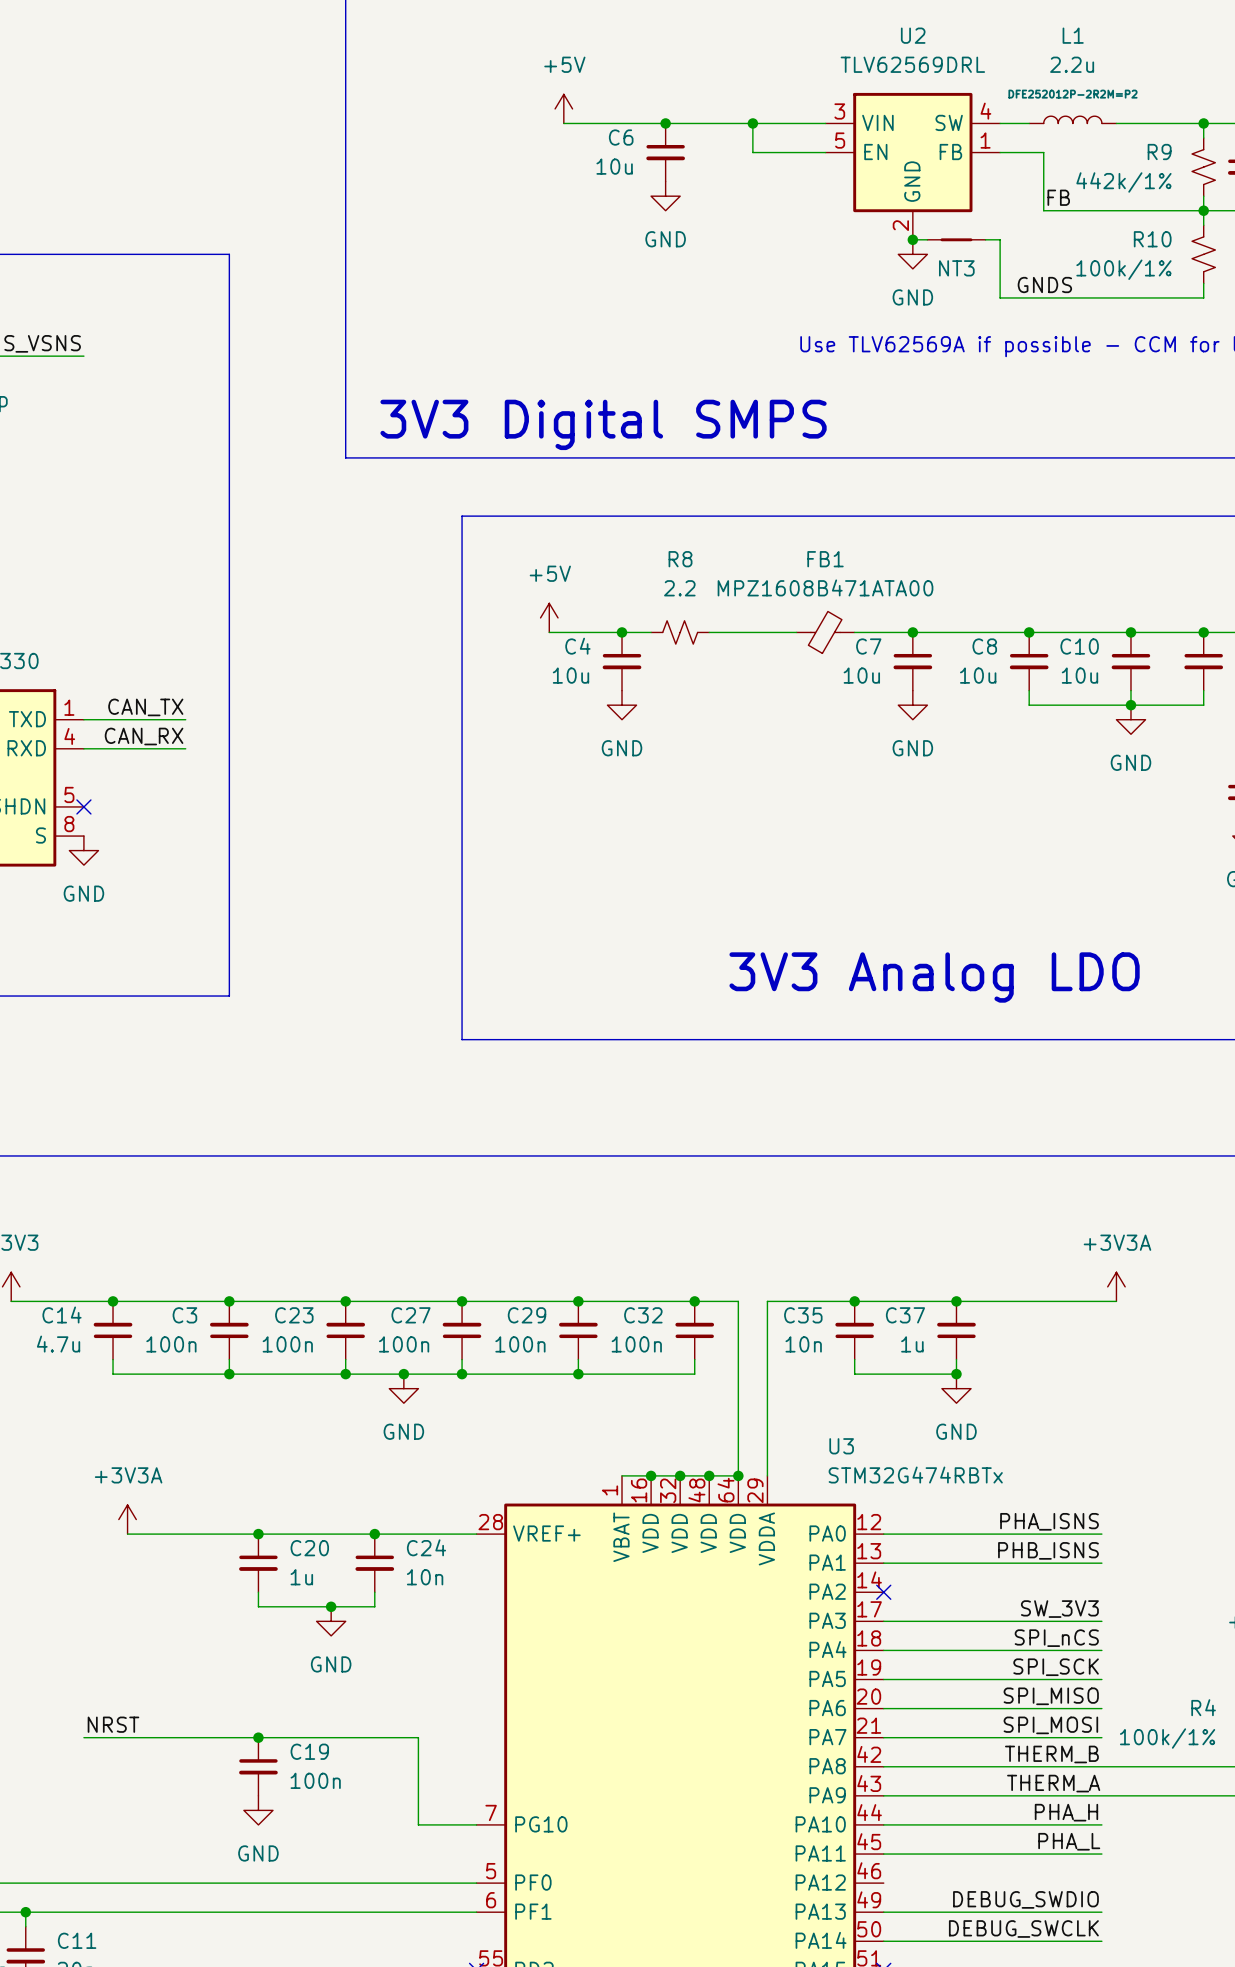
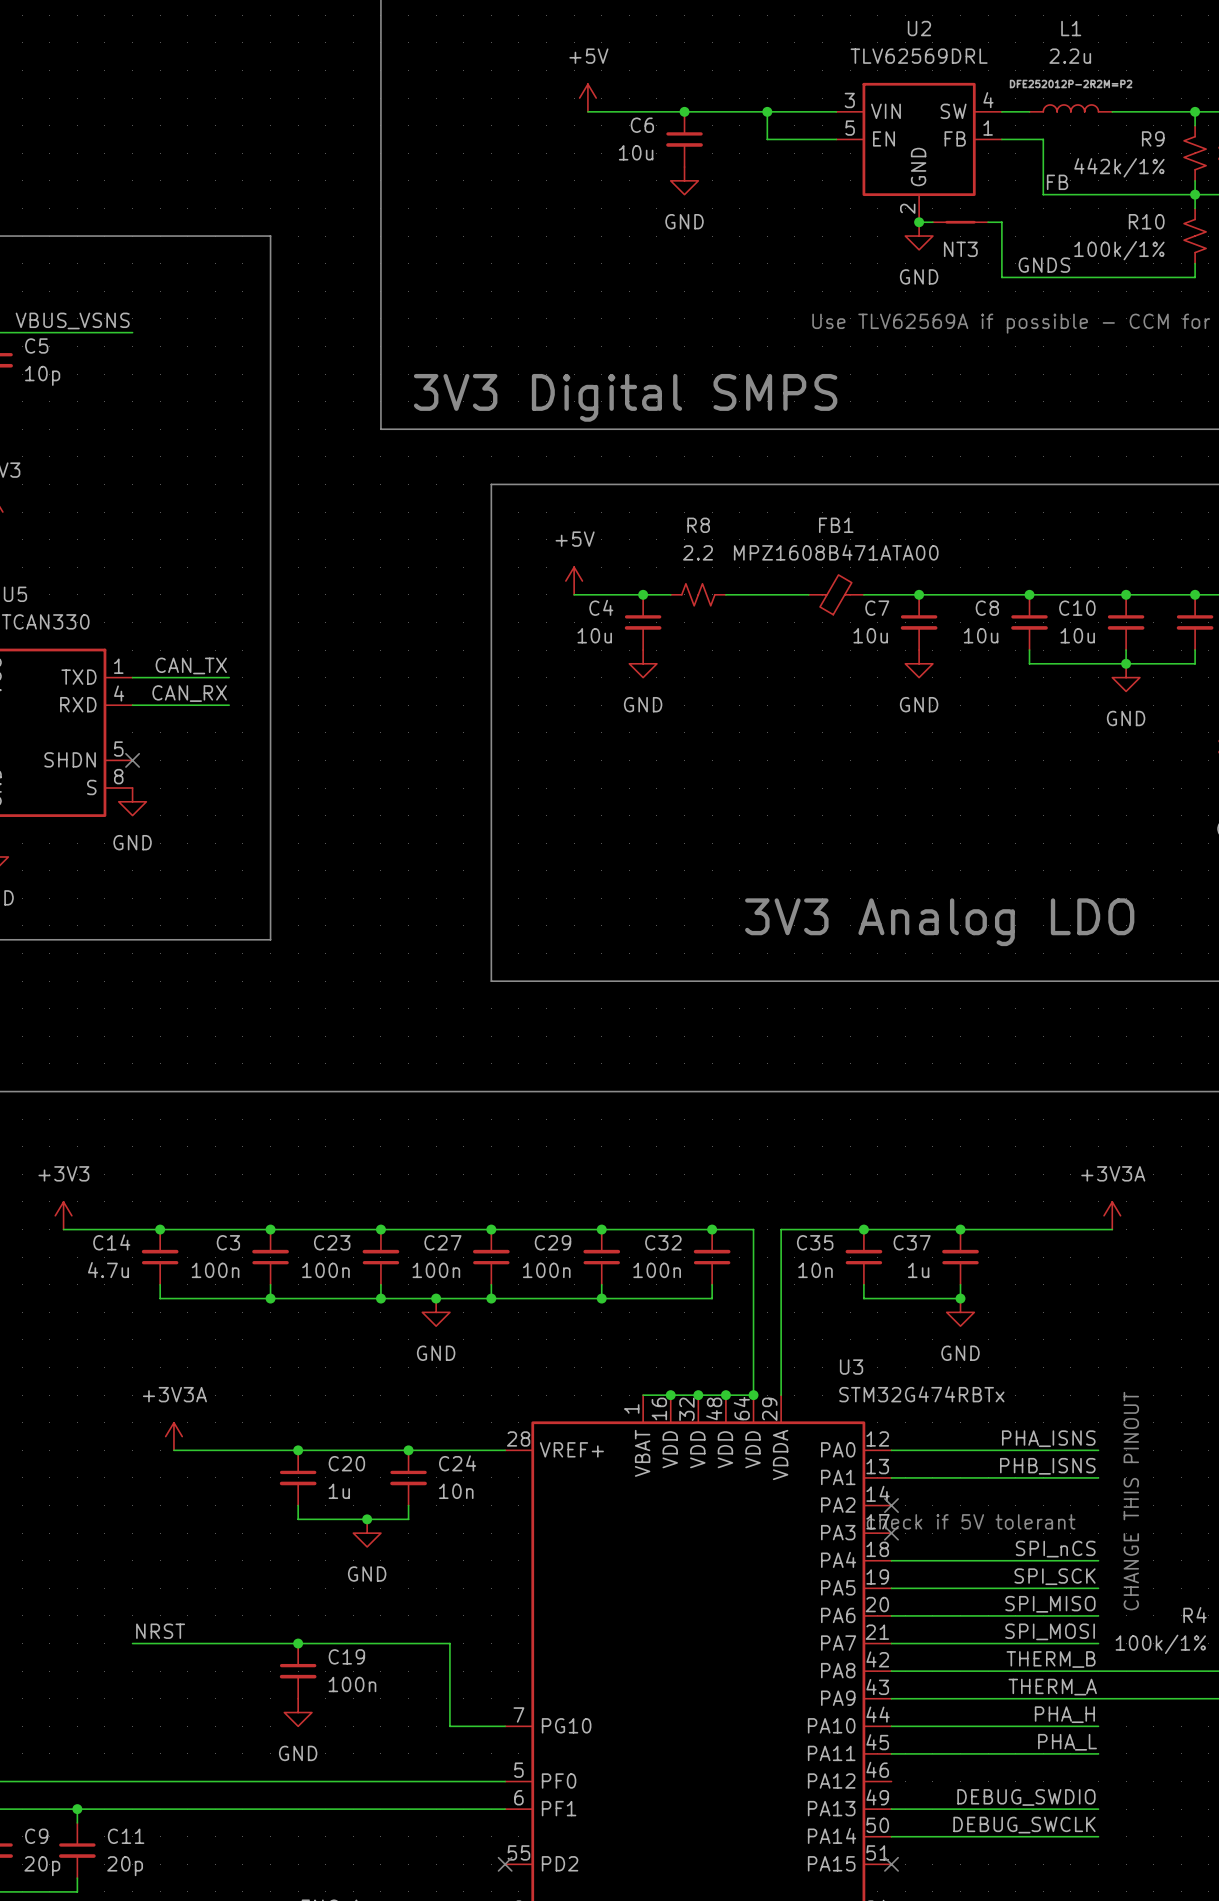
text: none -> CHANGE THIS PINOUT (1131, 1501)
text: none -> check if 5V tolerant (971, 1521)
label: SW_3V3 (1059, 1609) -> none
wire: (883, 1621) (1101, 1621) -> none
no-connect mark: none -> (891, 1533)

